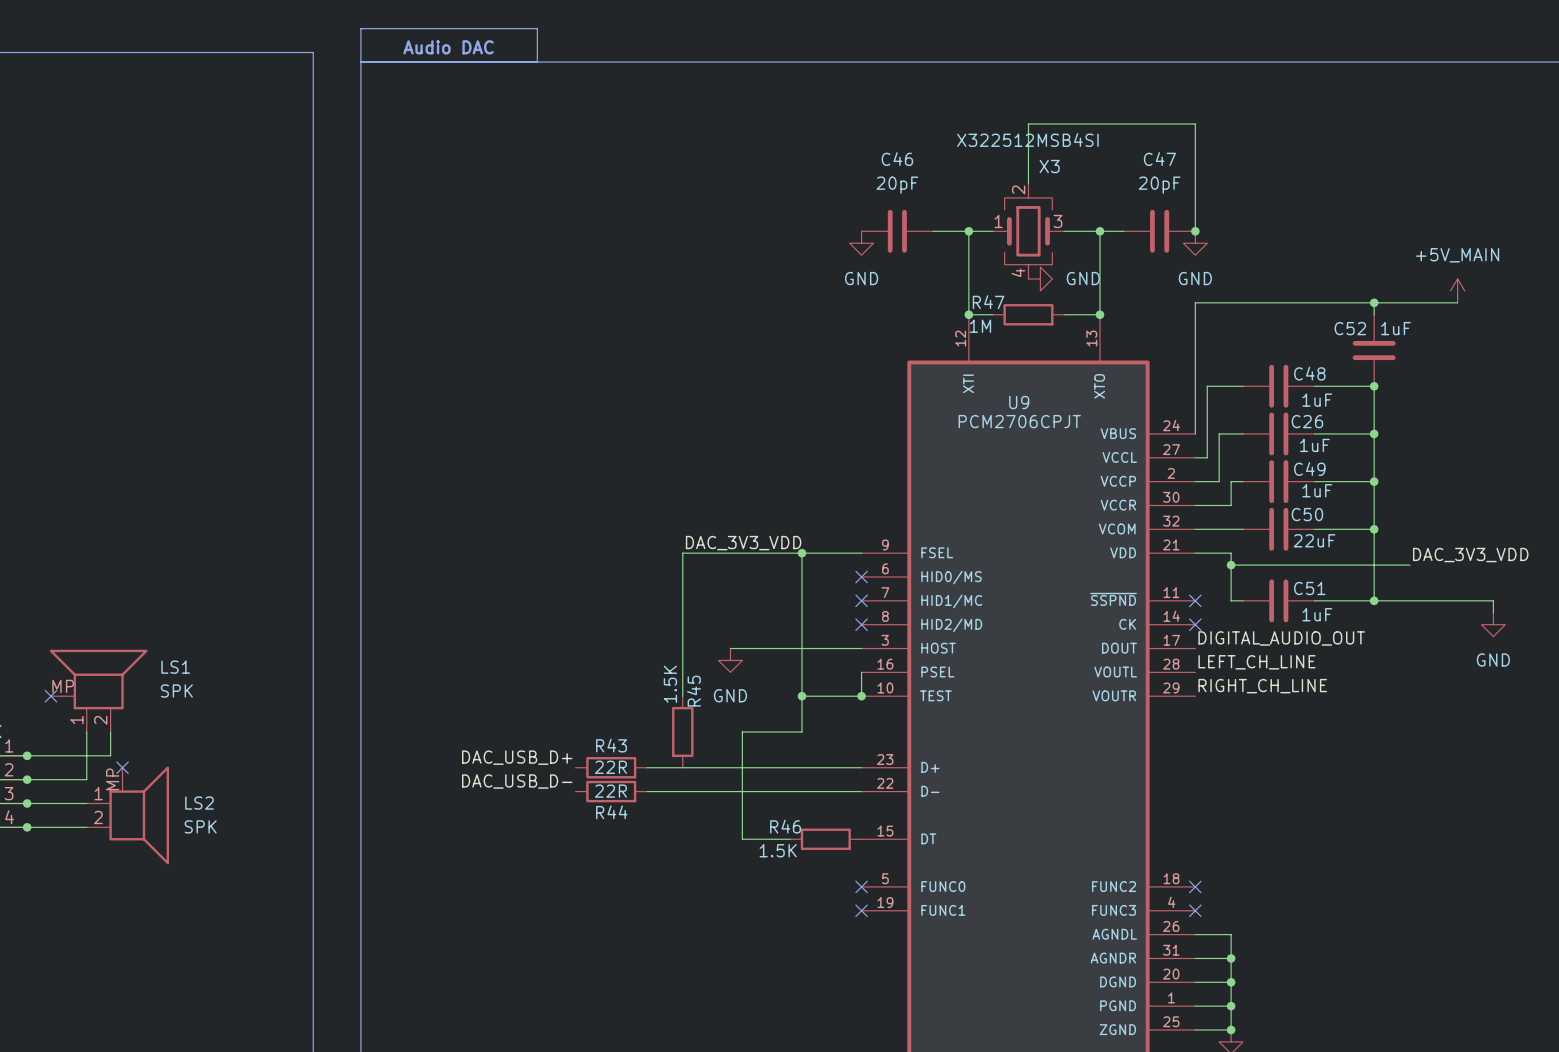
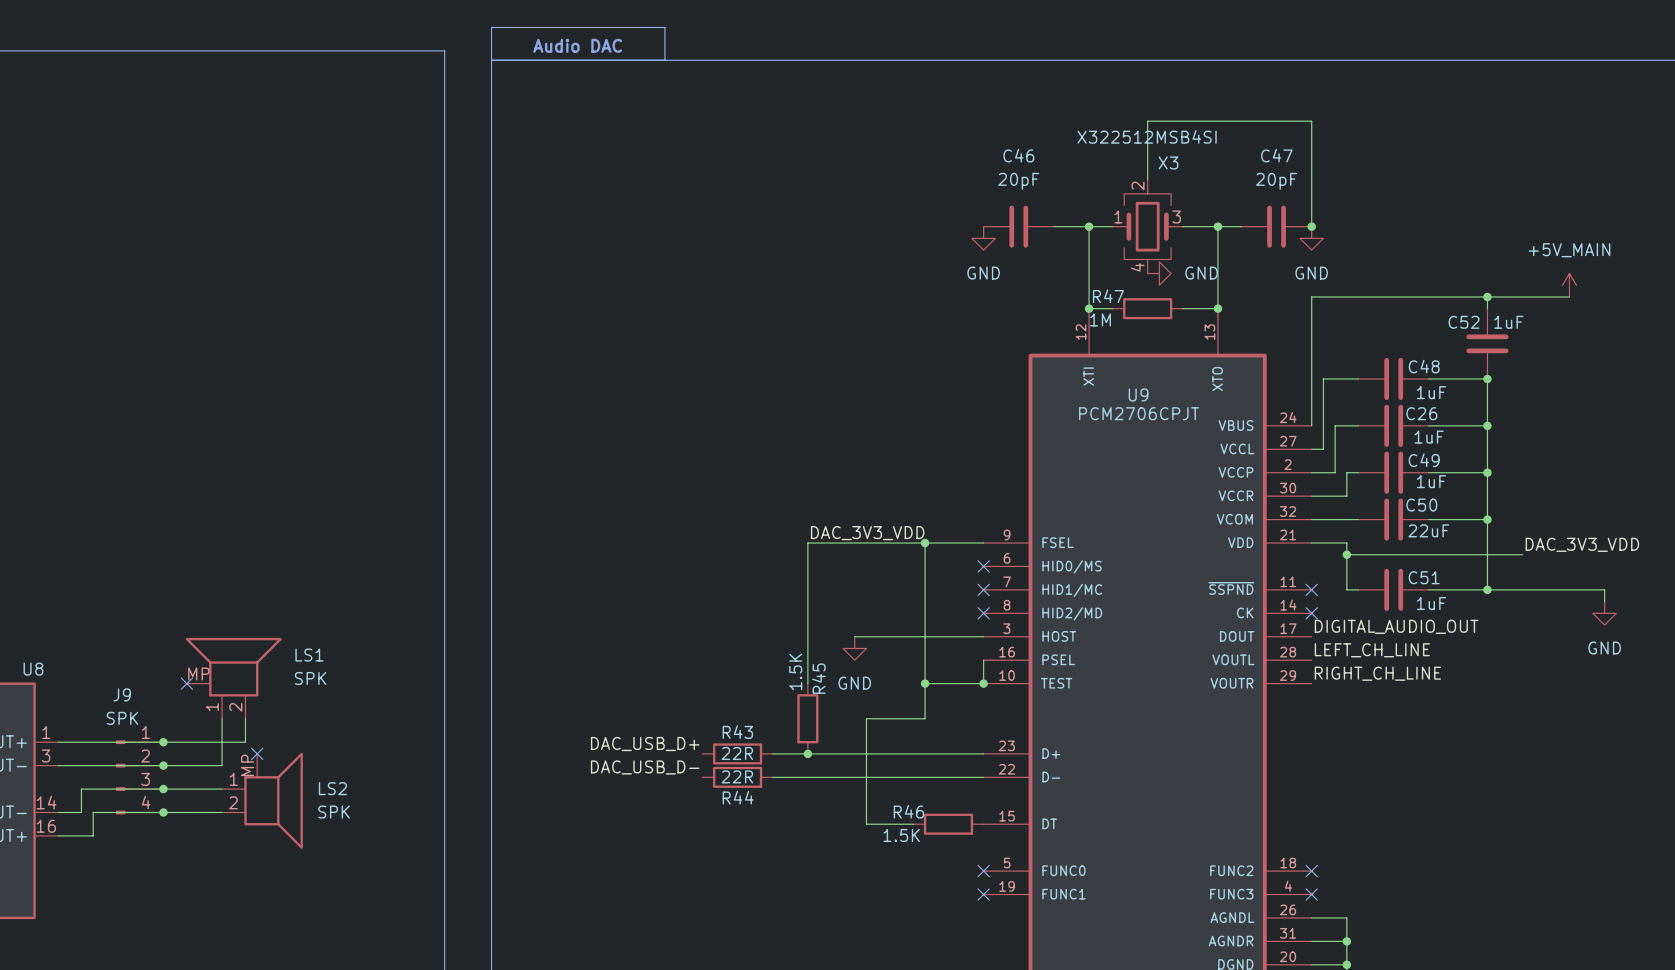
junction: none -> (807, 753)

